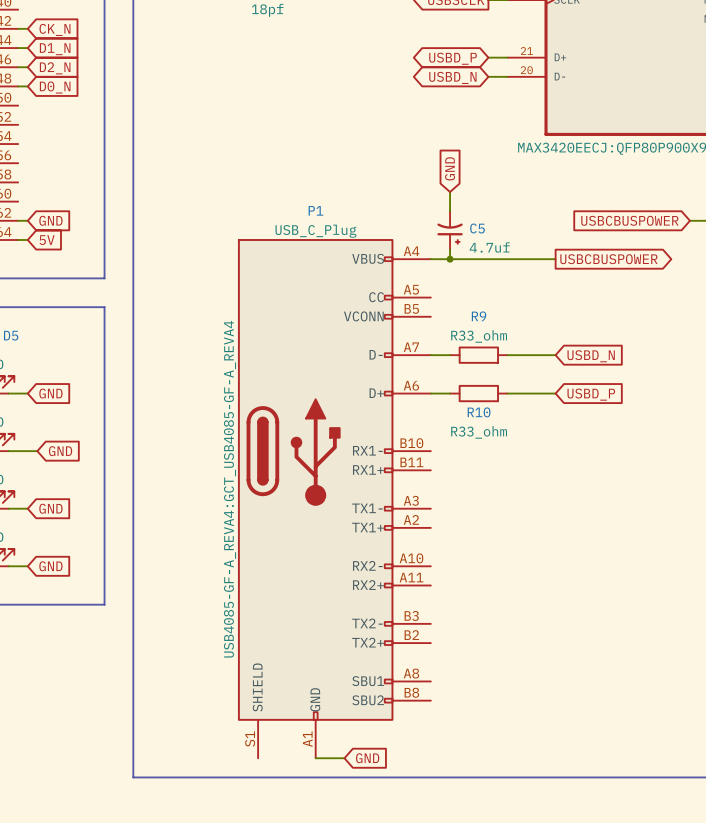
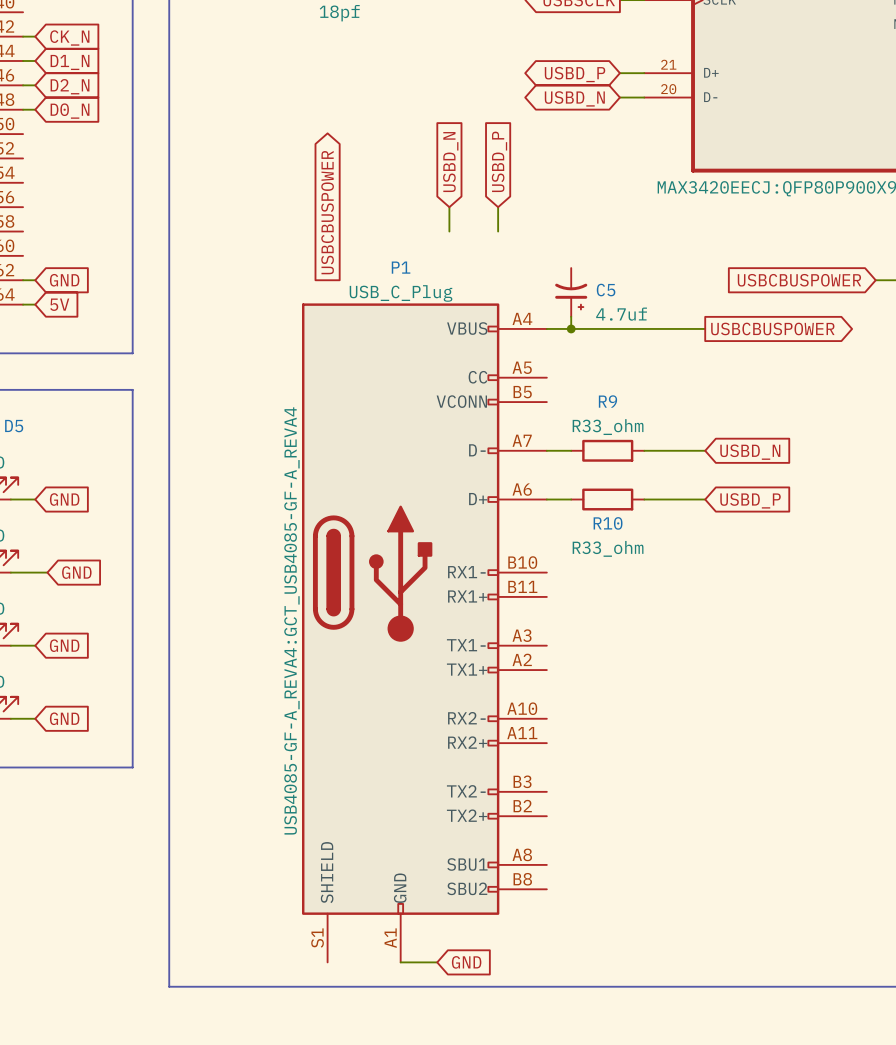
global label: none -> USBD_N (450, 162)
global label: none -> USBD_P (499, 161)
wire: none -> (449, 207) (449, 231)
global label: none -> USBCBUSPOWER (327, 212)
global label: GND (450, 168) -> none
wire: (450, 192) (450, 211) -> (498, 207) (498, 231)

